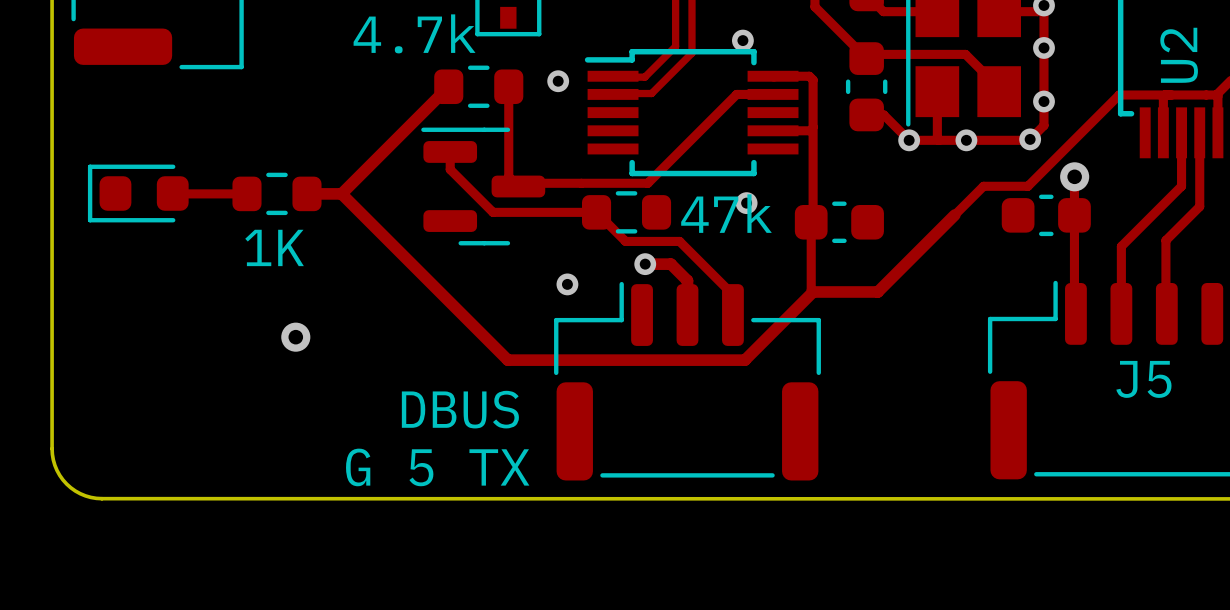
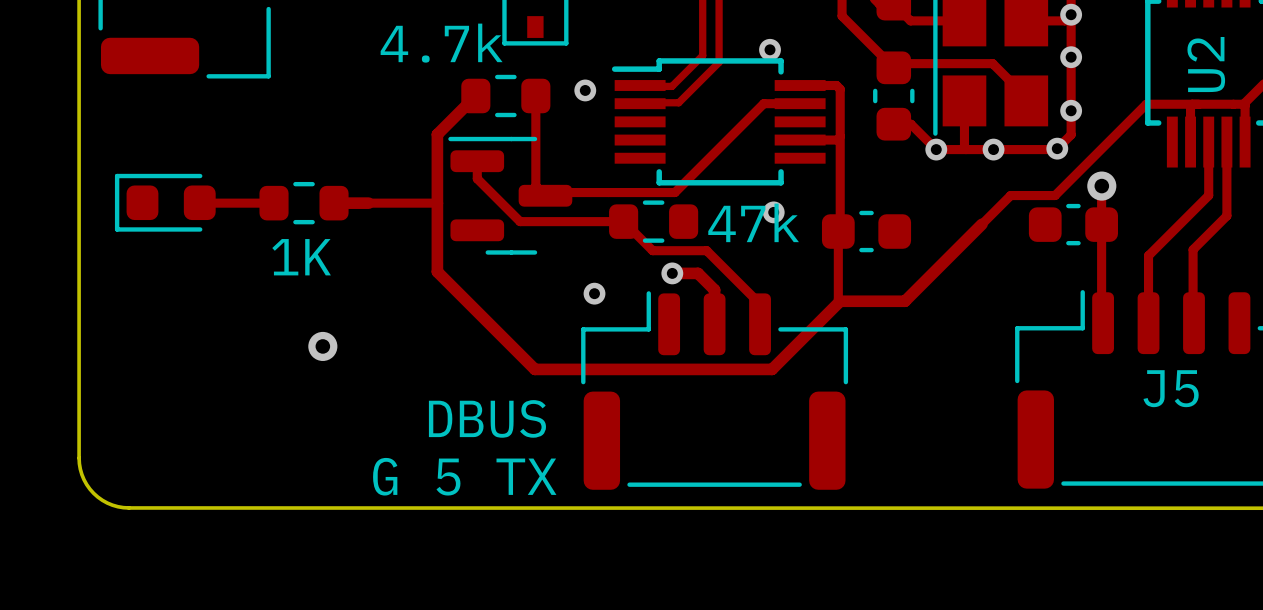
track: (410, 125) (341, 193) (410, 262) -> (437, 134) (437, 271)
track: none -> (368, 203) (437, 203)

